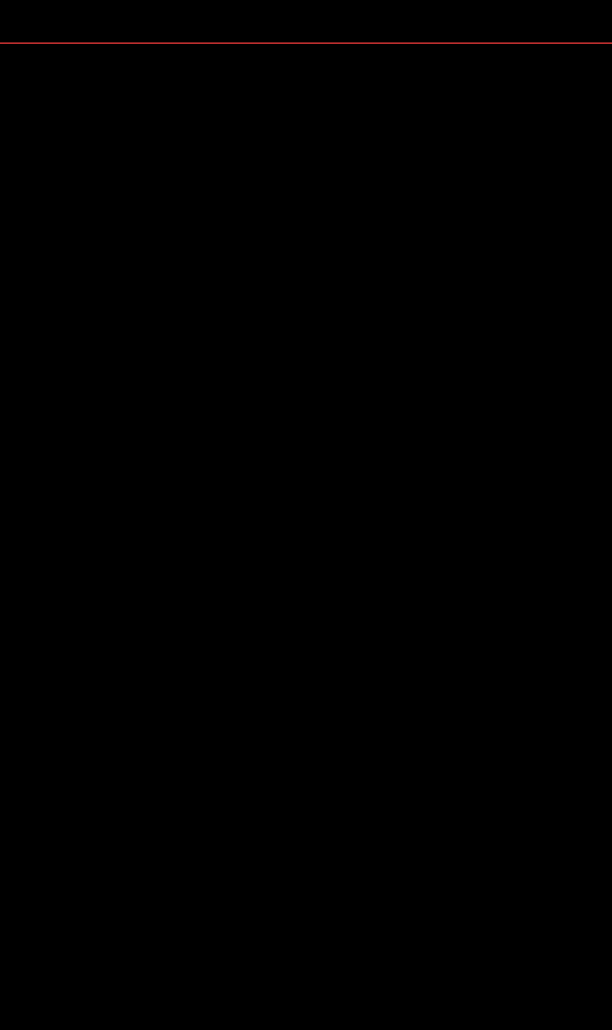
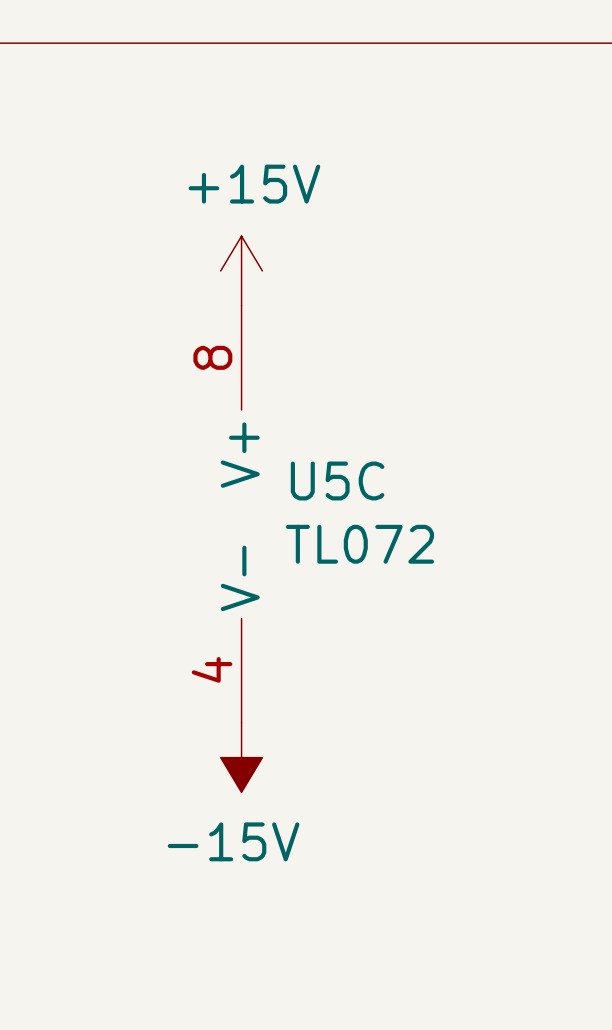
power symbol: none -> +15V (241, 270)
U5C: none -> TL072 (241, 514)
power symbol: none -> -15V (241, 757)

